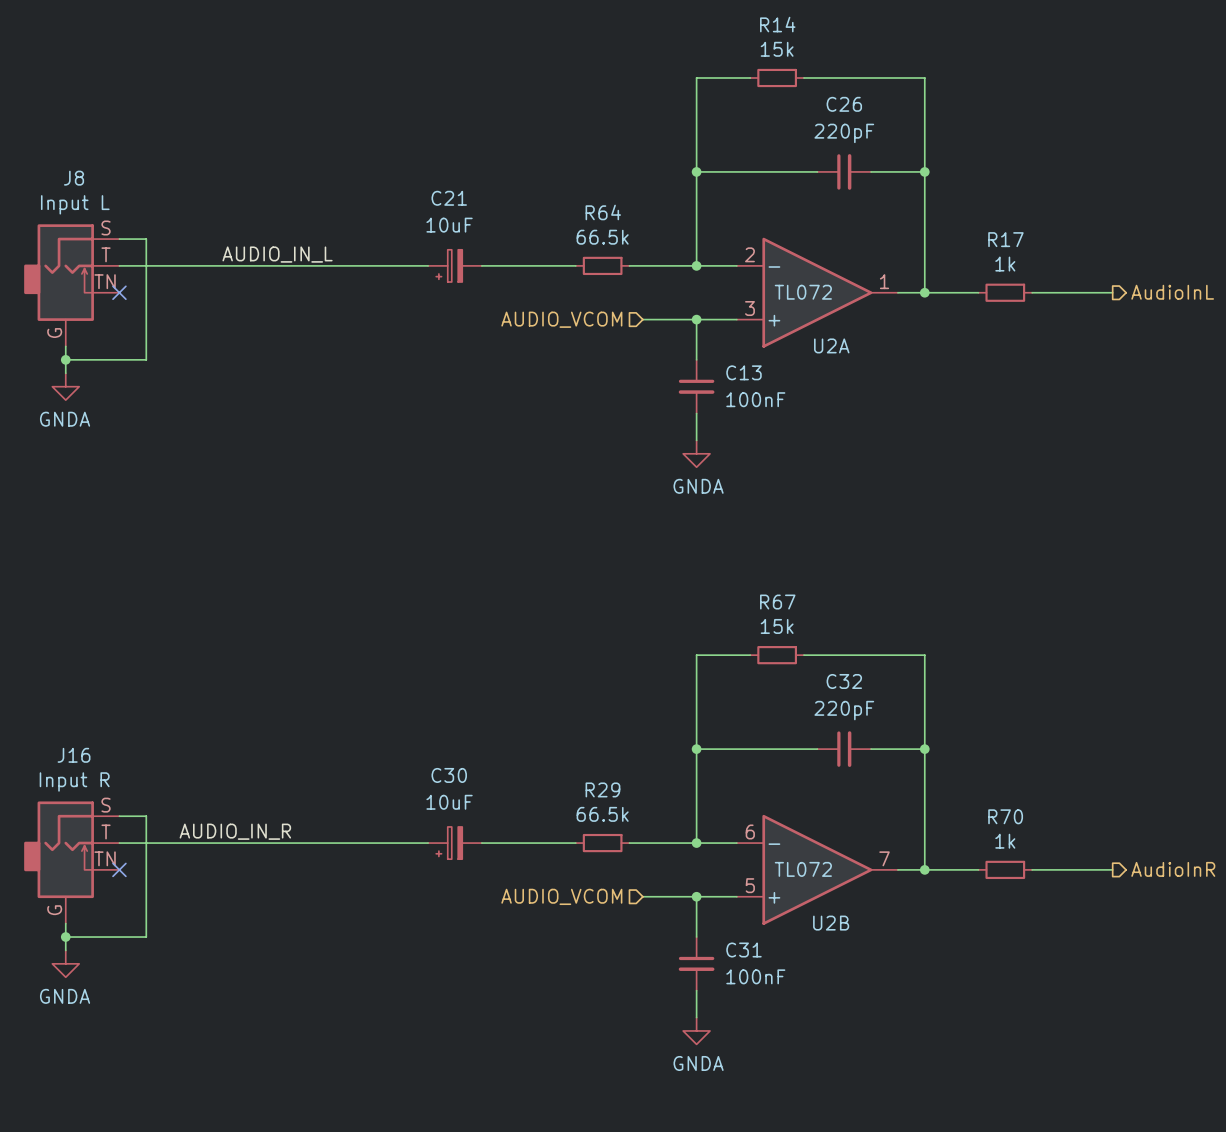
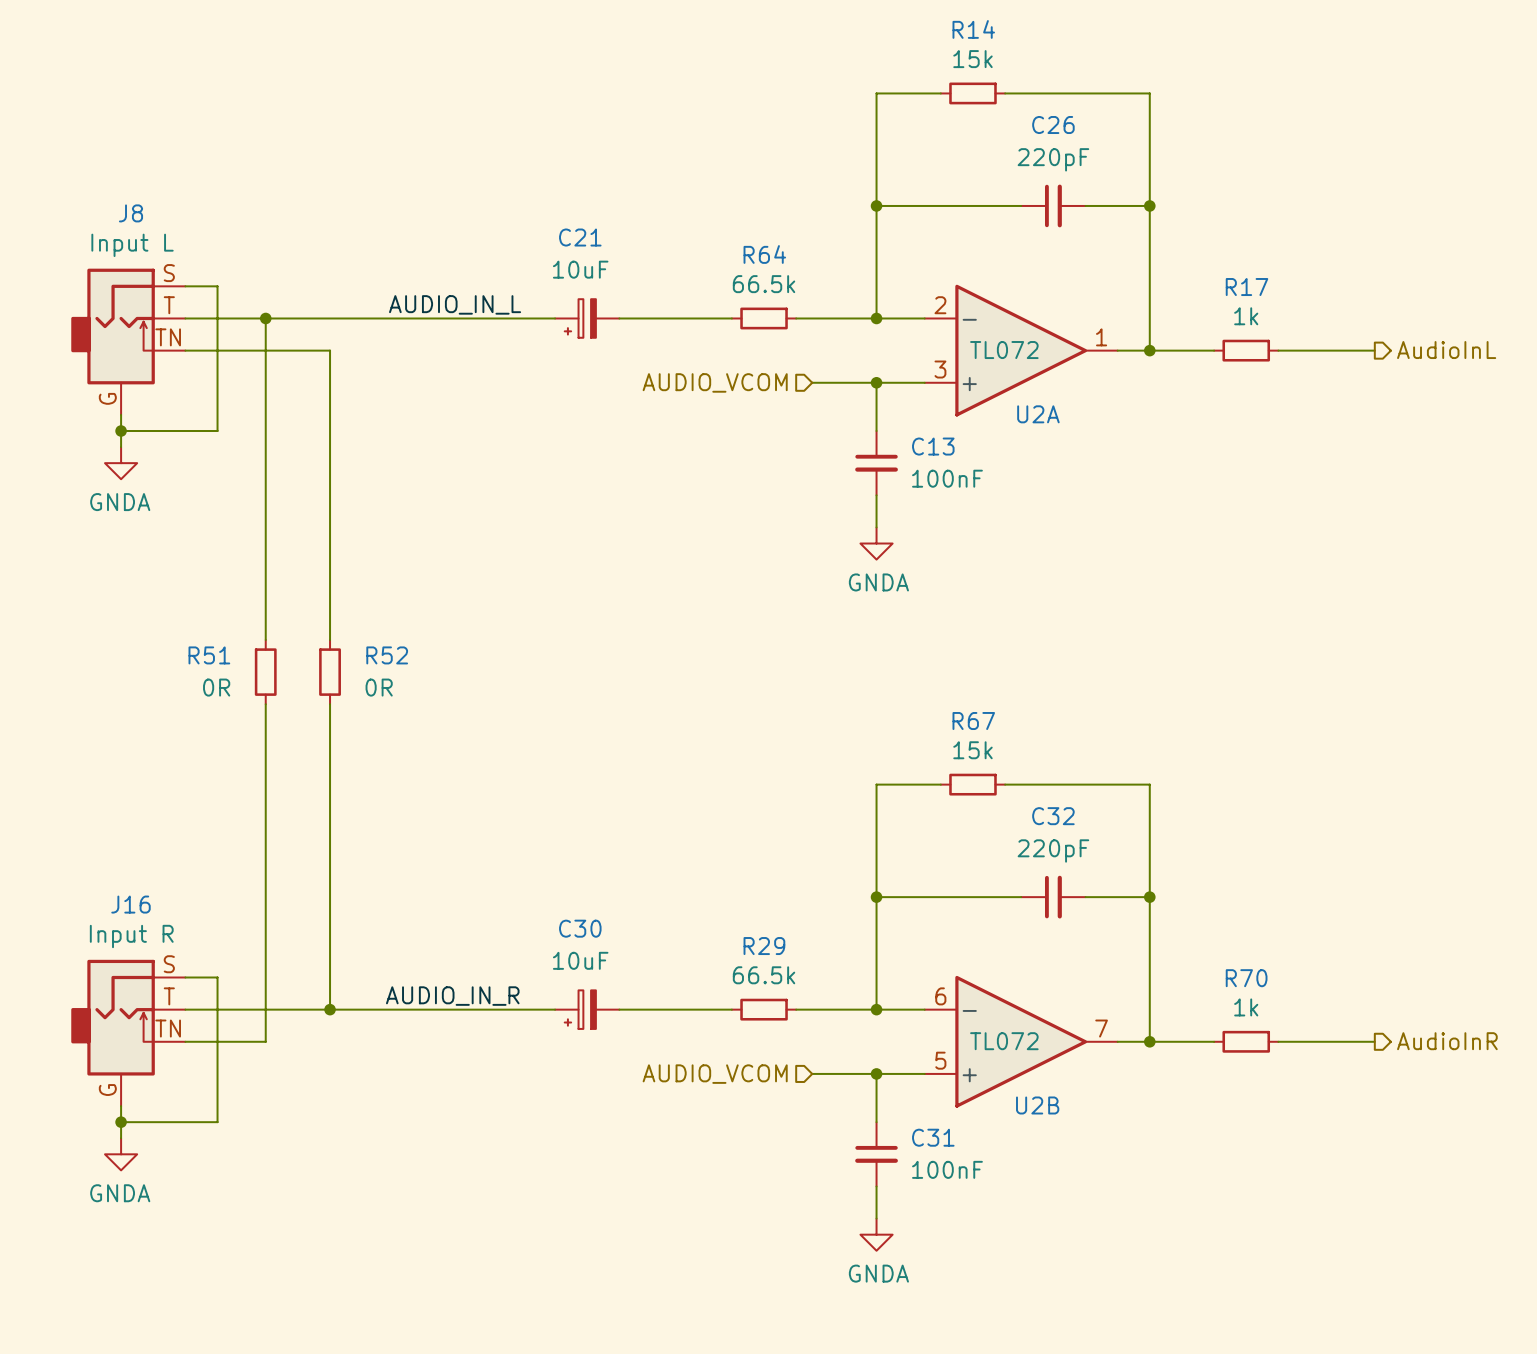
label position: AUDIO_IN_L (277, 254) -> AUDIO_IN_L (455, 304)
wire: none -> (265, 318) (265, 639)
junction: none -> (265, 318)
wire: none -> (185, 350) (330, 350) (330, 639)
no-connect mark: (119, 292) -> none
R51: none -> 0R (265, 672)
R52: none -> 0R (330, 672)
wire: none -> (265, 704) (265, 1041) (185, 1041)
wire: none -> (330, 704) (330, 1009)
label position: AUDIO_IN_R (235, 831) -> AUDIO_IN_R (452, 996)
junction: none -> (330, 1009)
no-connect mark: (119, 869) -> none

